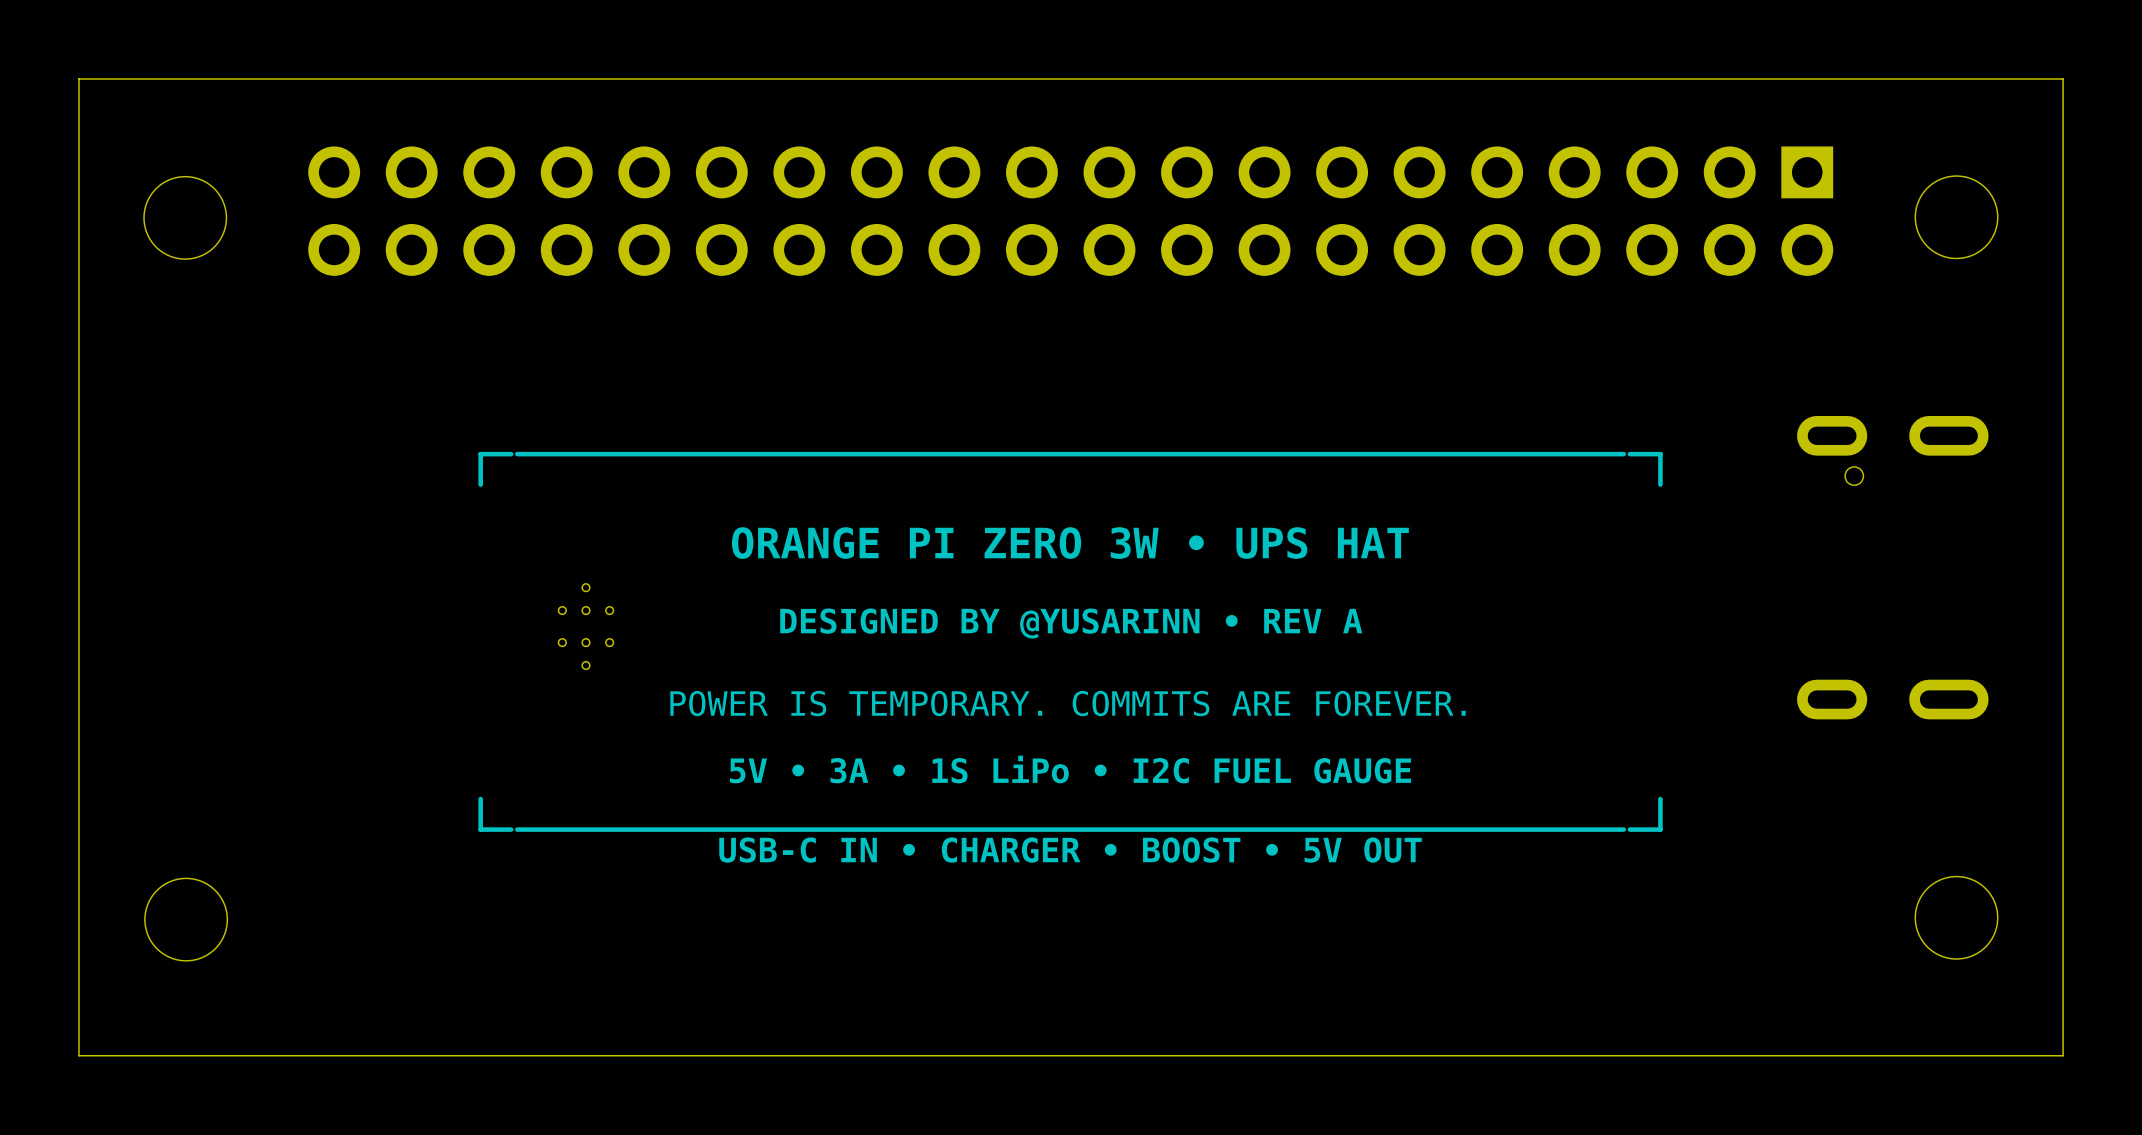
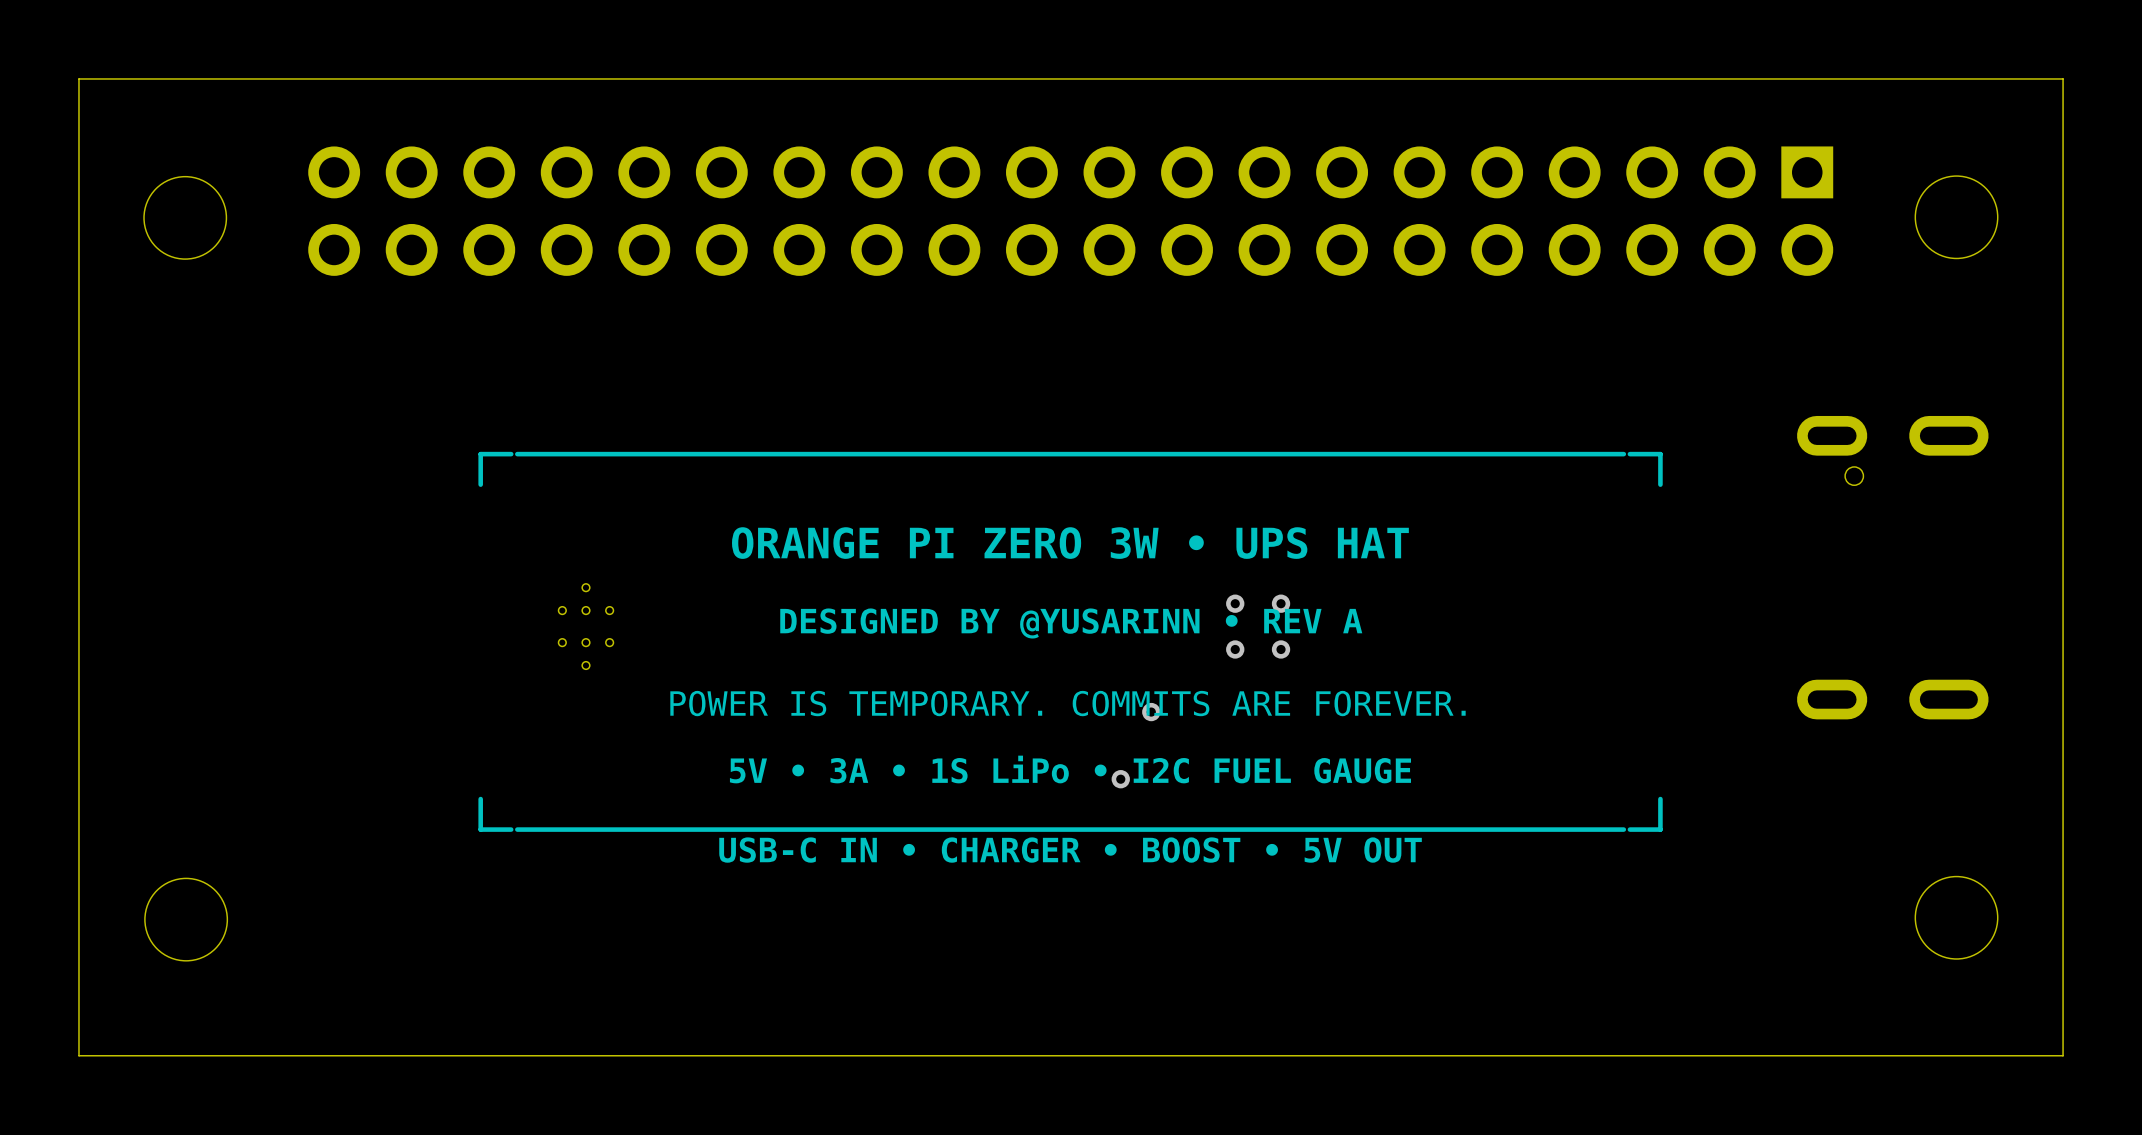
via: none -> (1235, 603)
via: none -> (1281, 603)
via: none -> (1235, 649)
via: none -> (1281, 649)
via: none -> (1151, 712)
via: none -> (1120, 779)

